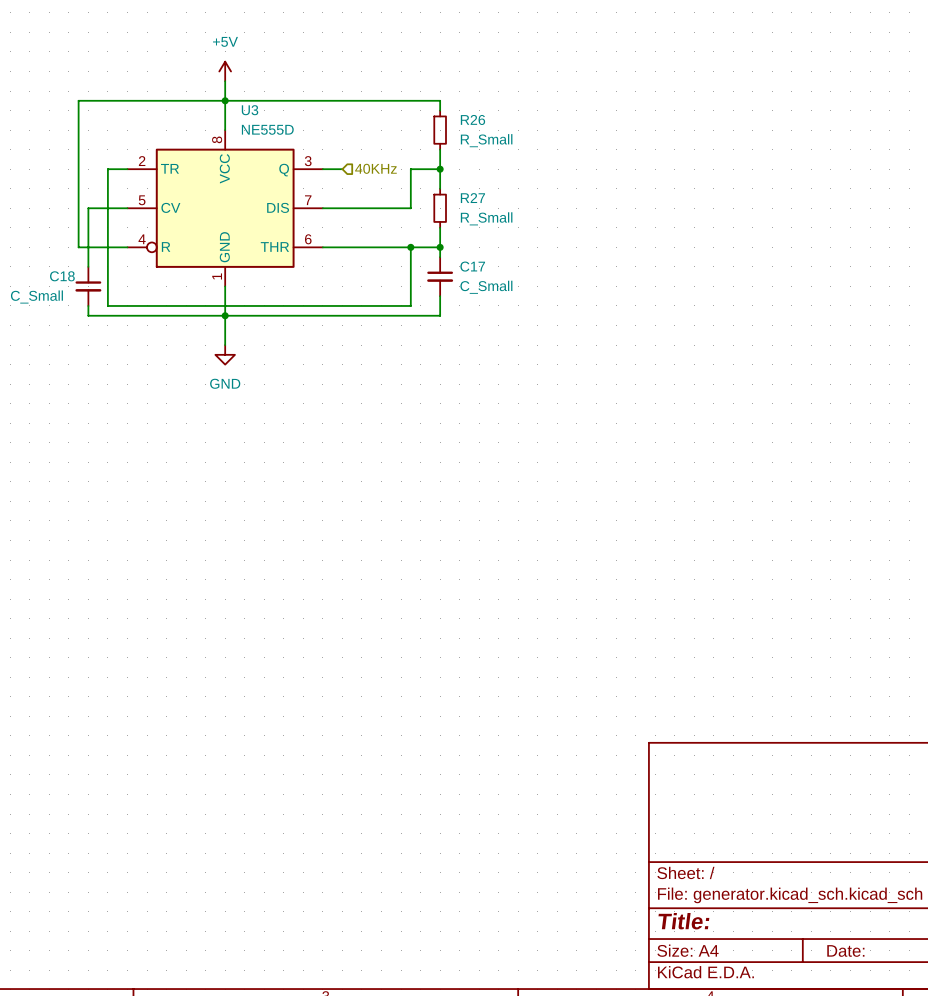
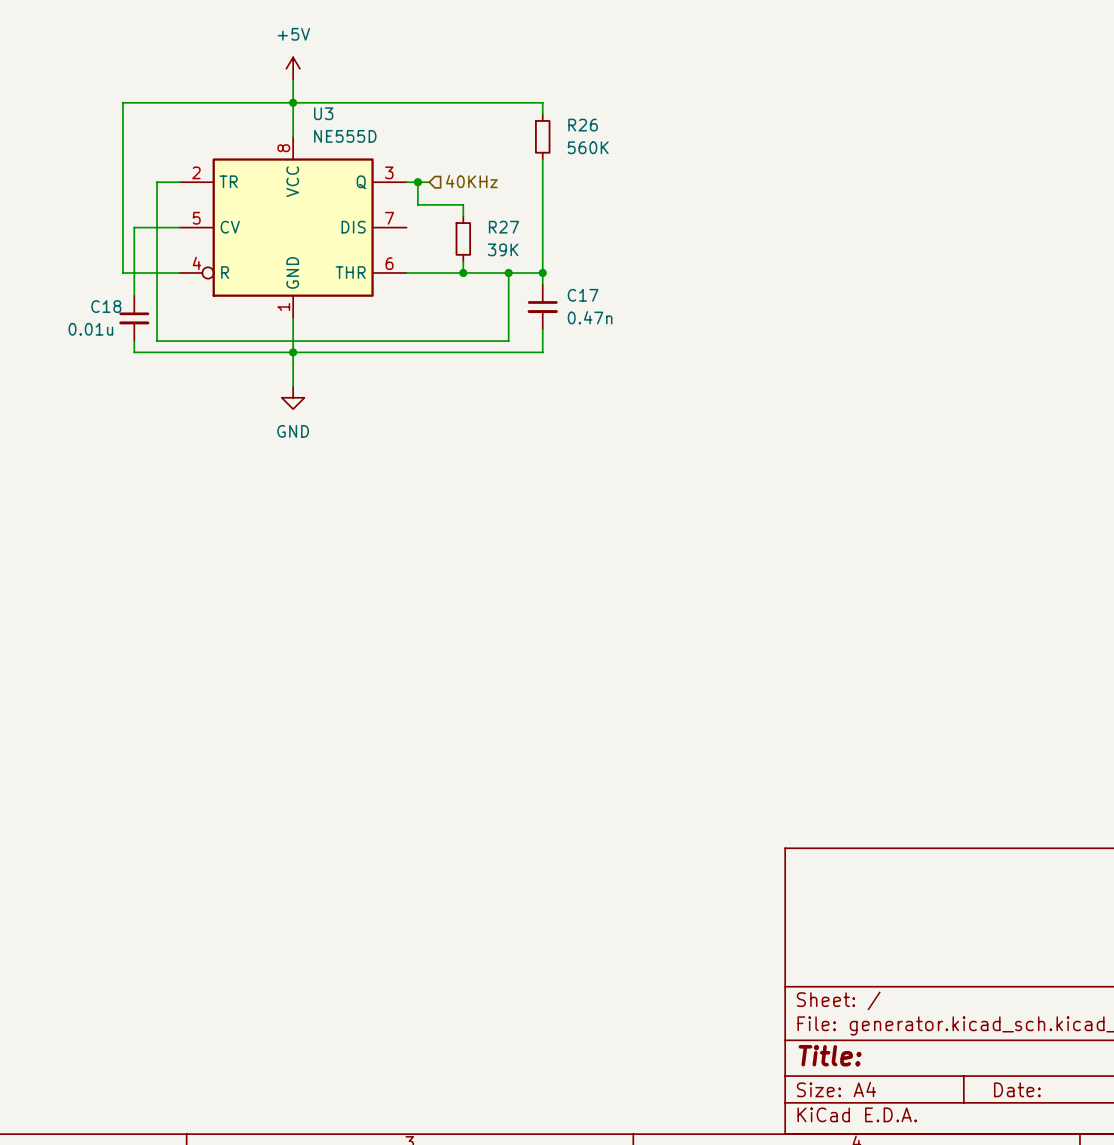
R26 value: R_Small (486, 140) -> 560K (588, 147)
wire: none -> (417, 182) (417, 204) (463, 204) (463, 216)
junction: none -> (417, 182)
wire: (440, 169) (410, 169) (410, 208) (322, 208) -> none
junction: (440, 169) -> none
wire: none -> (542, 204) (542, 250)
R27 position: (440, 208) -> (463, 238)
R27 value: R_Small (486, 218) -> 39K (503, 249)
wire: none -> (463, 261) (463, 272)
junction: none -> (463, 272)
C17 value: C_Small (486, 287) -> 0.47n (590, 317)
C18 value: C_Small (36, 297) -> 0.01u (90, 329)

